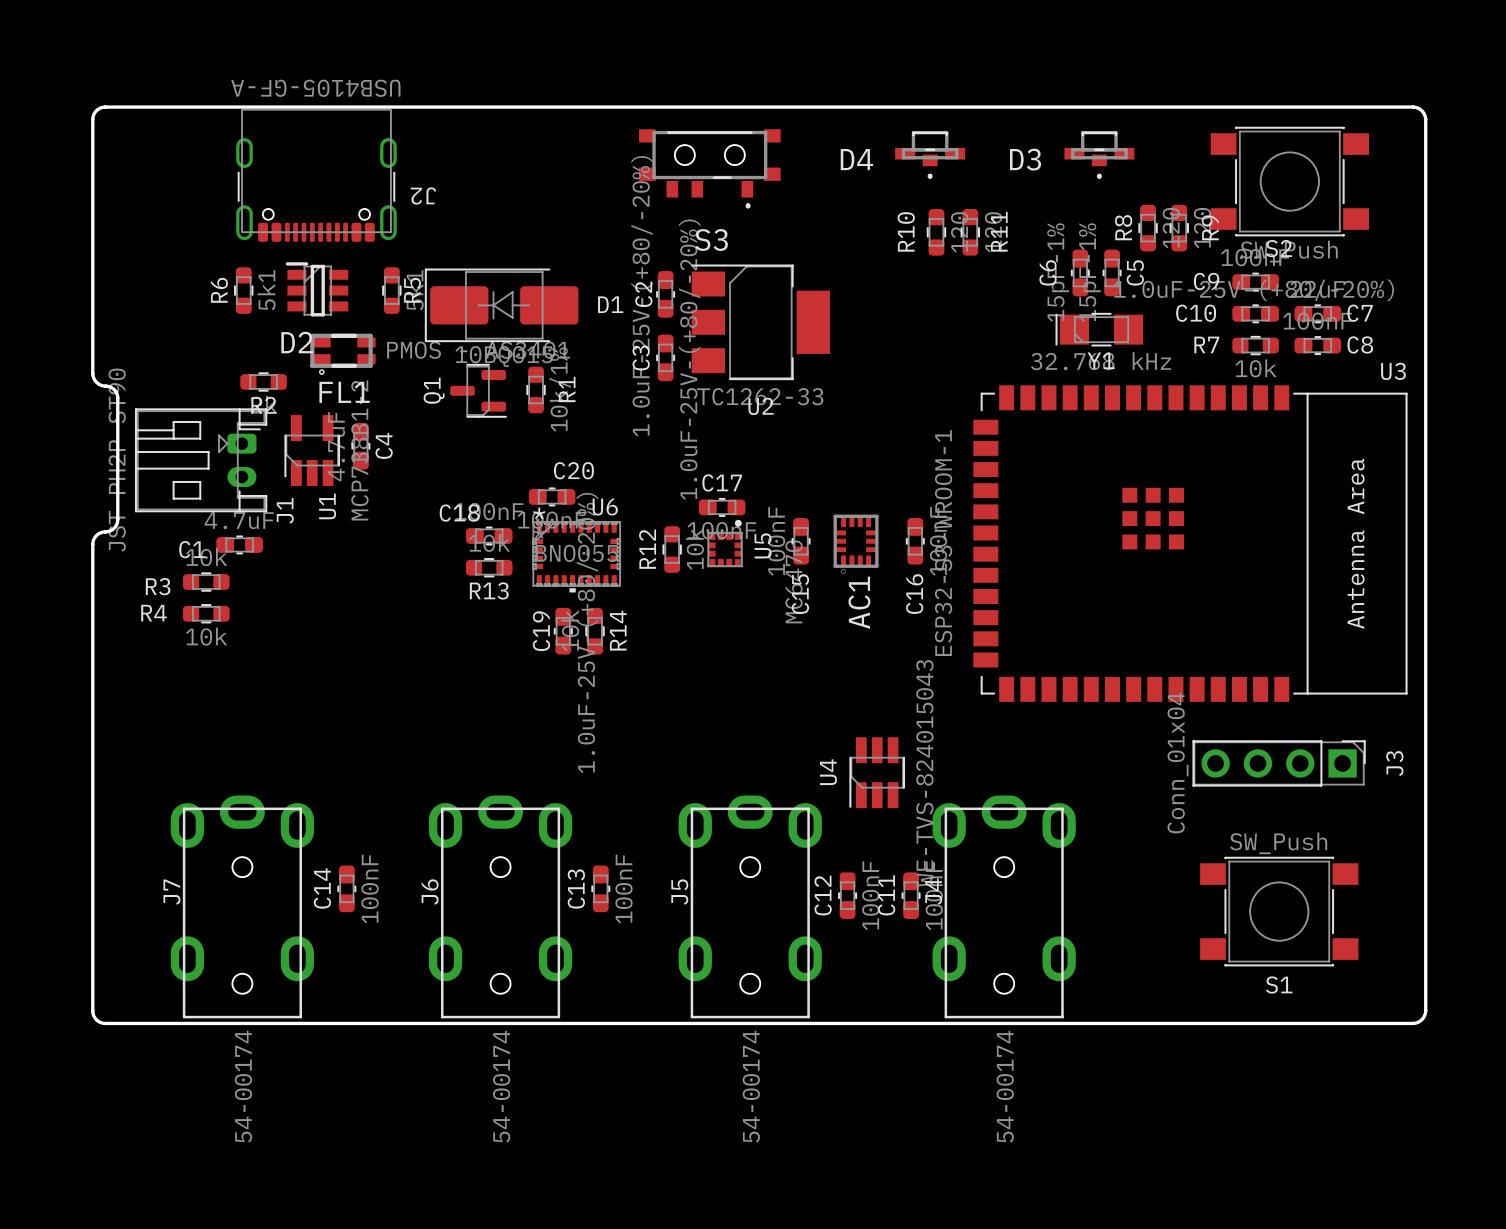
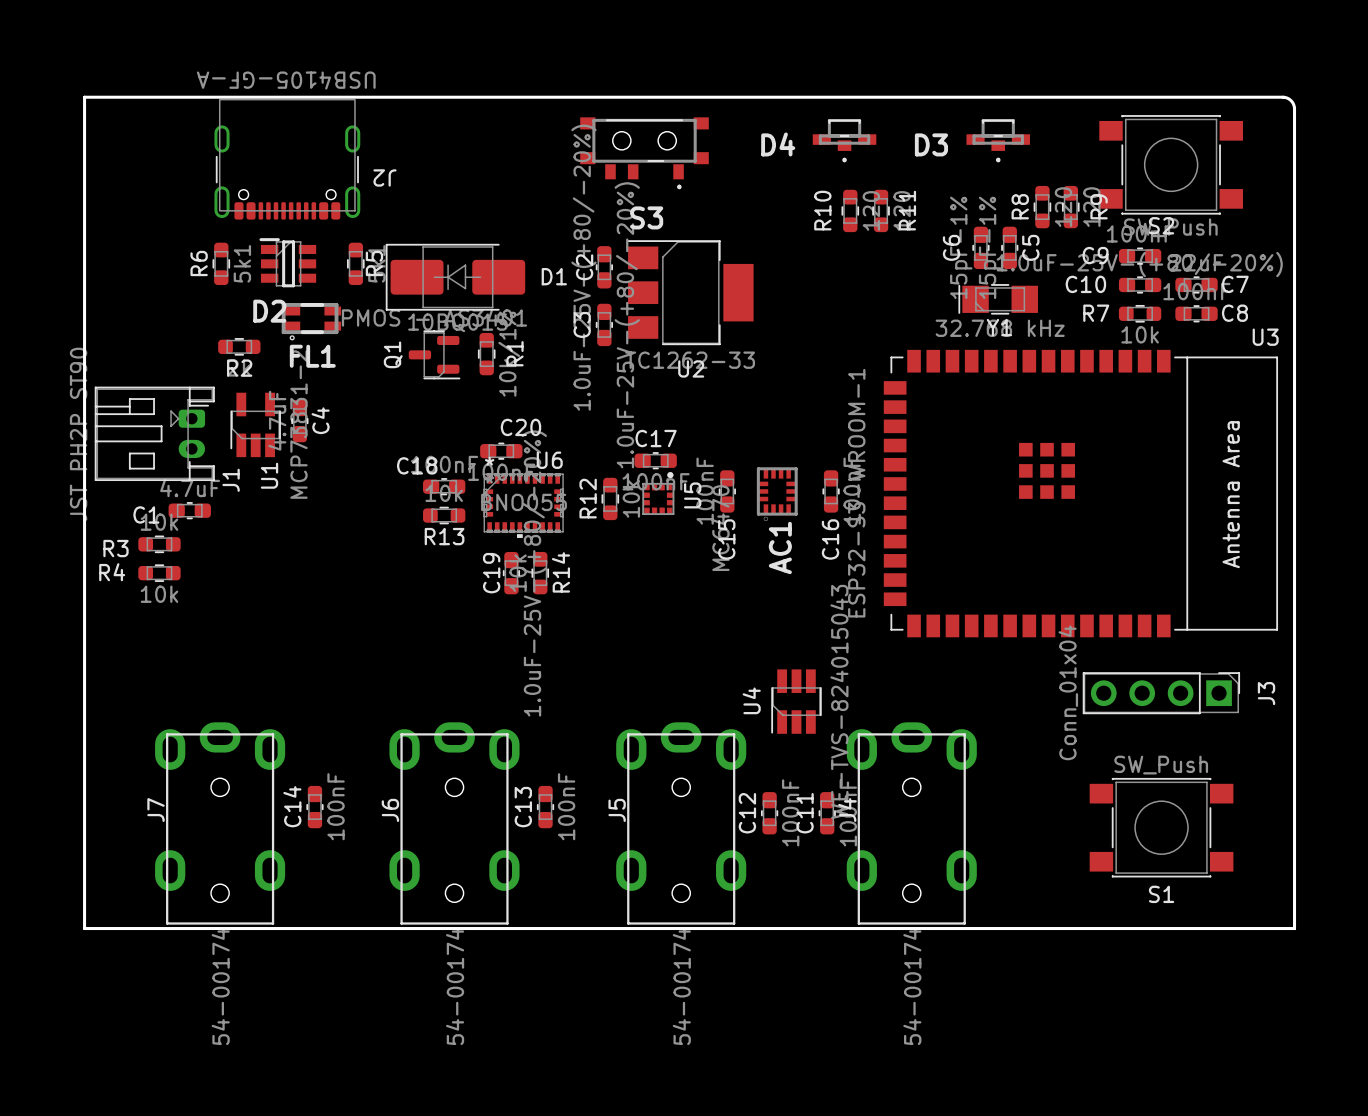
board edge: (105, 107) (96, 110) (92, 119) (92, 373) (96, 382) (113, 388) (117, 396) (117, 518) (114, 528) (97, 534) (92, 544) (92, 1010) (97, 1020) (105, 1023) (1413, 1023) (1422, 1019) (1425, 1010) -> (95, 97) (84, 97) (84, 928) (1294, 928) (1294, 917)
C4 position: (360, 446) -> (299, 421)
U1 position: (312, 450) -> (255, 424)
J1 position: (201, 460) -> (154, 433)
C1 position: (239, 544) -> (189, 510)
R3 position: (206, 582) -> (159, 544)
R4 position: (206, 613) -> (159, 573)

